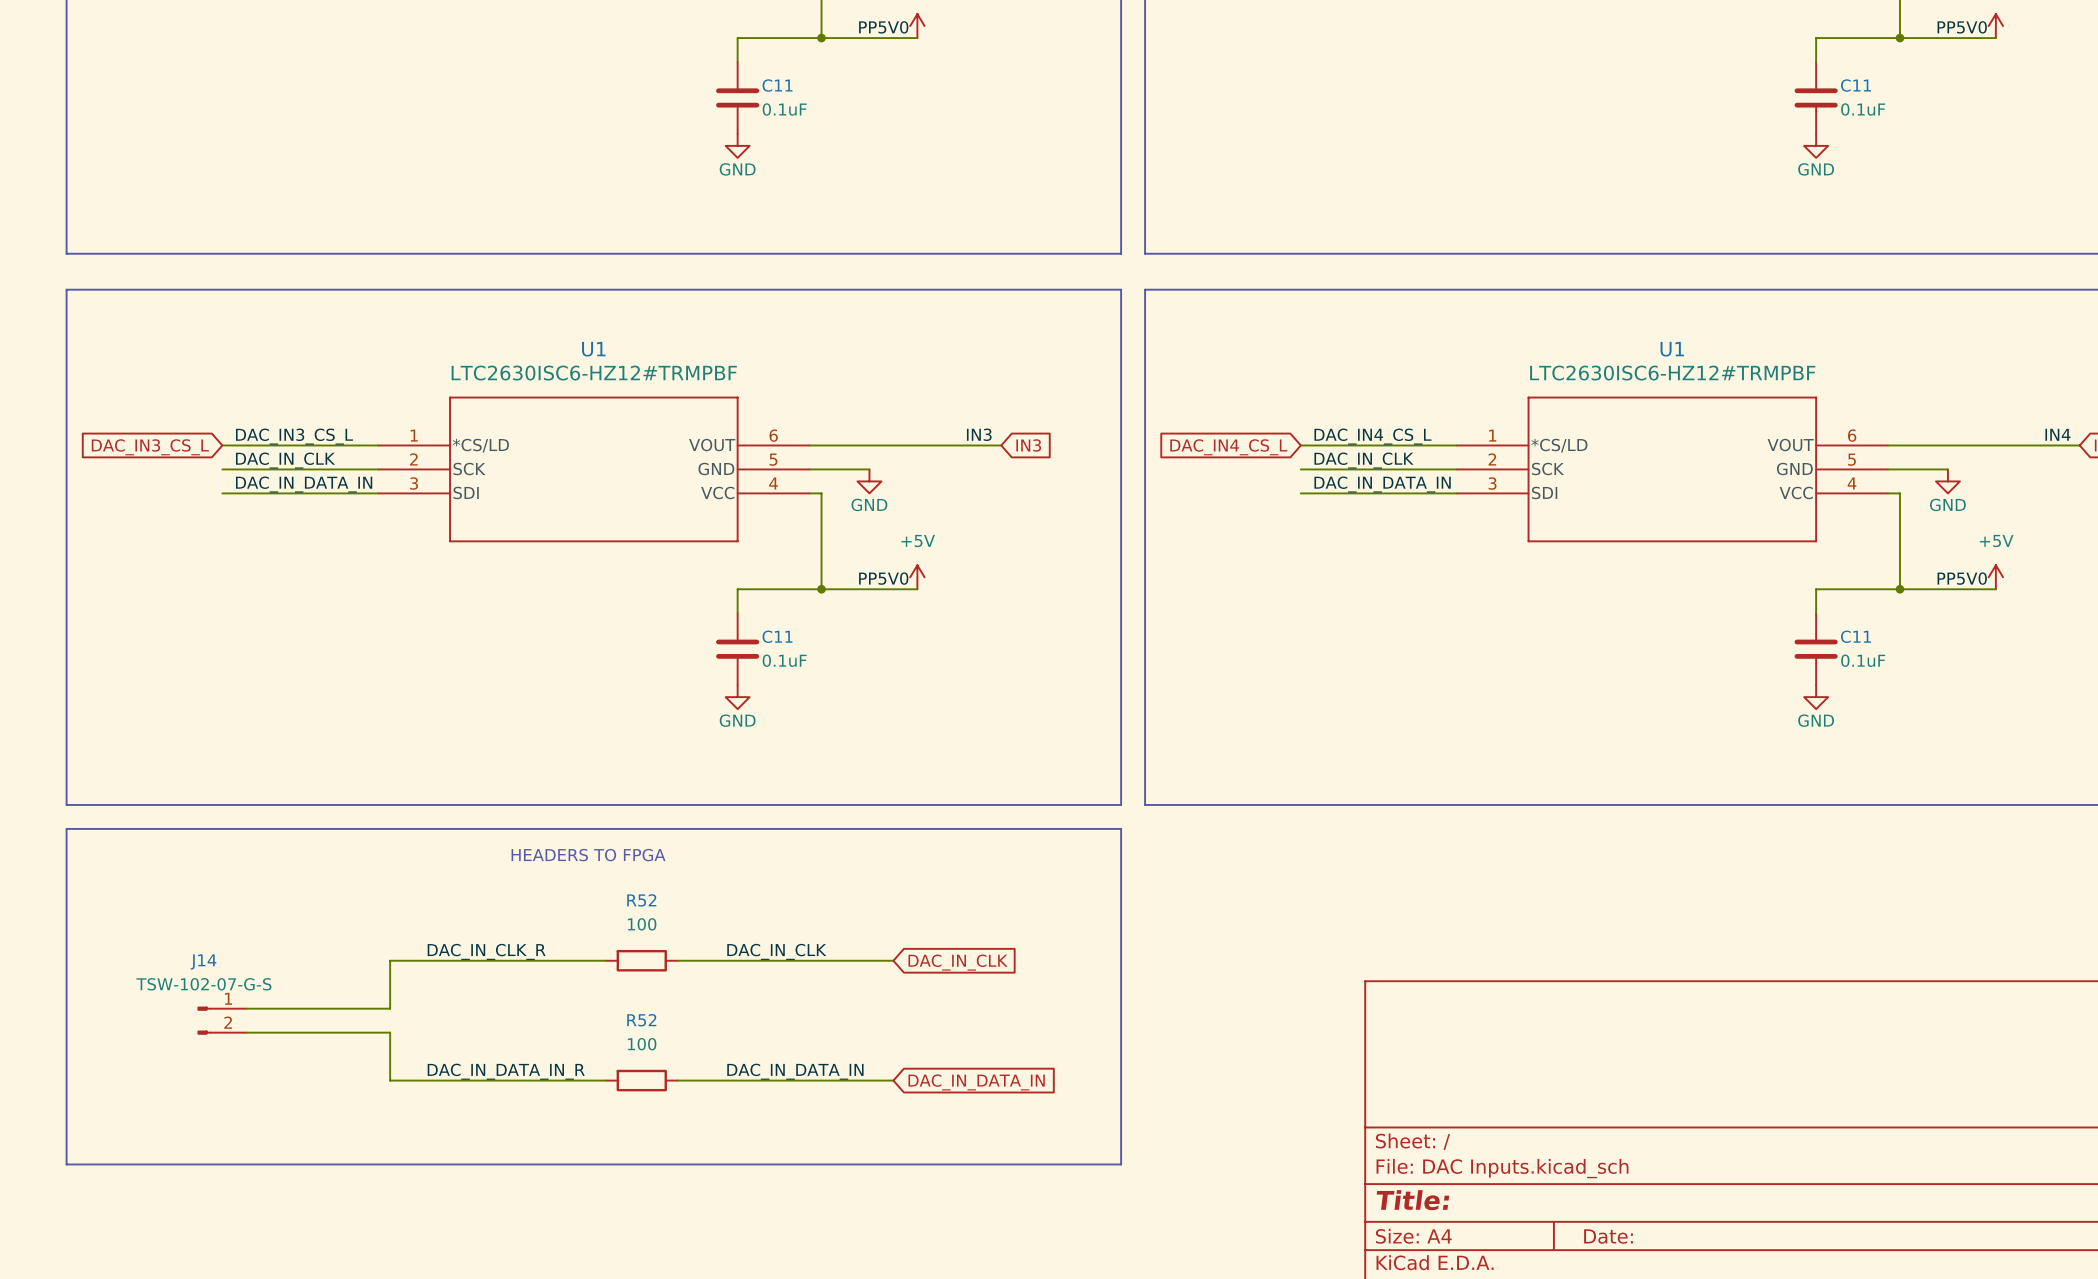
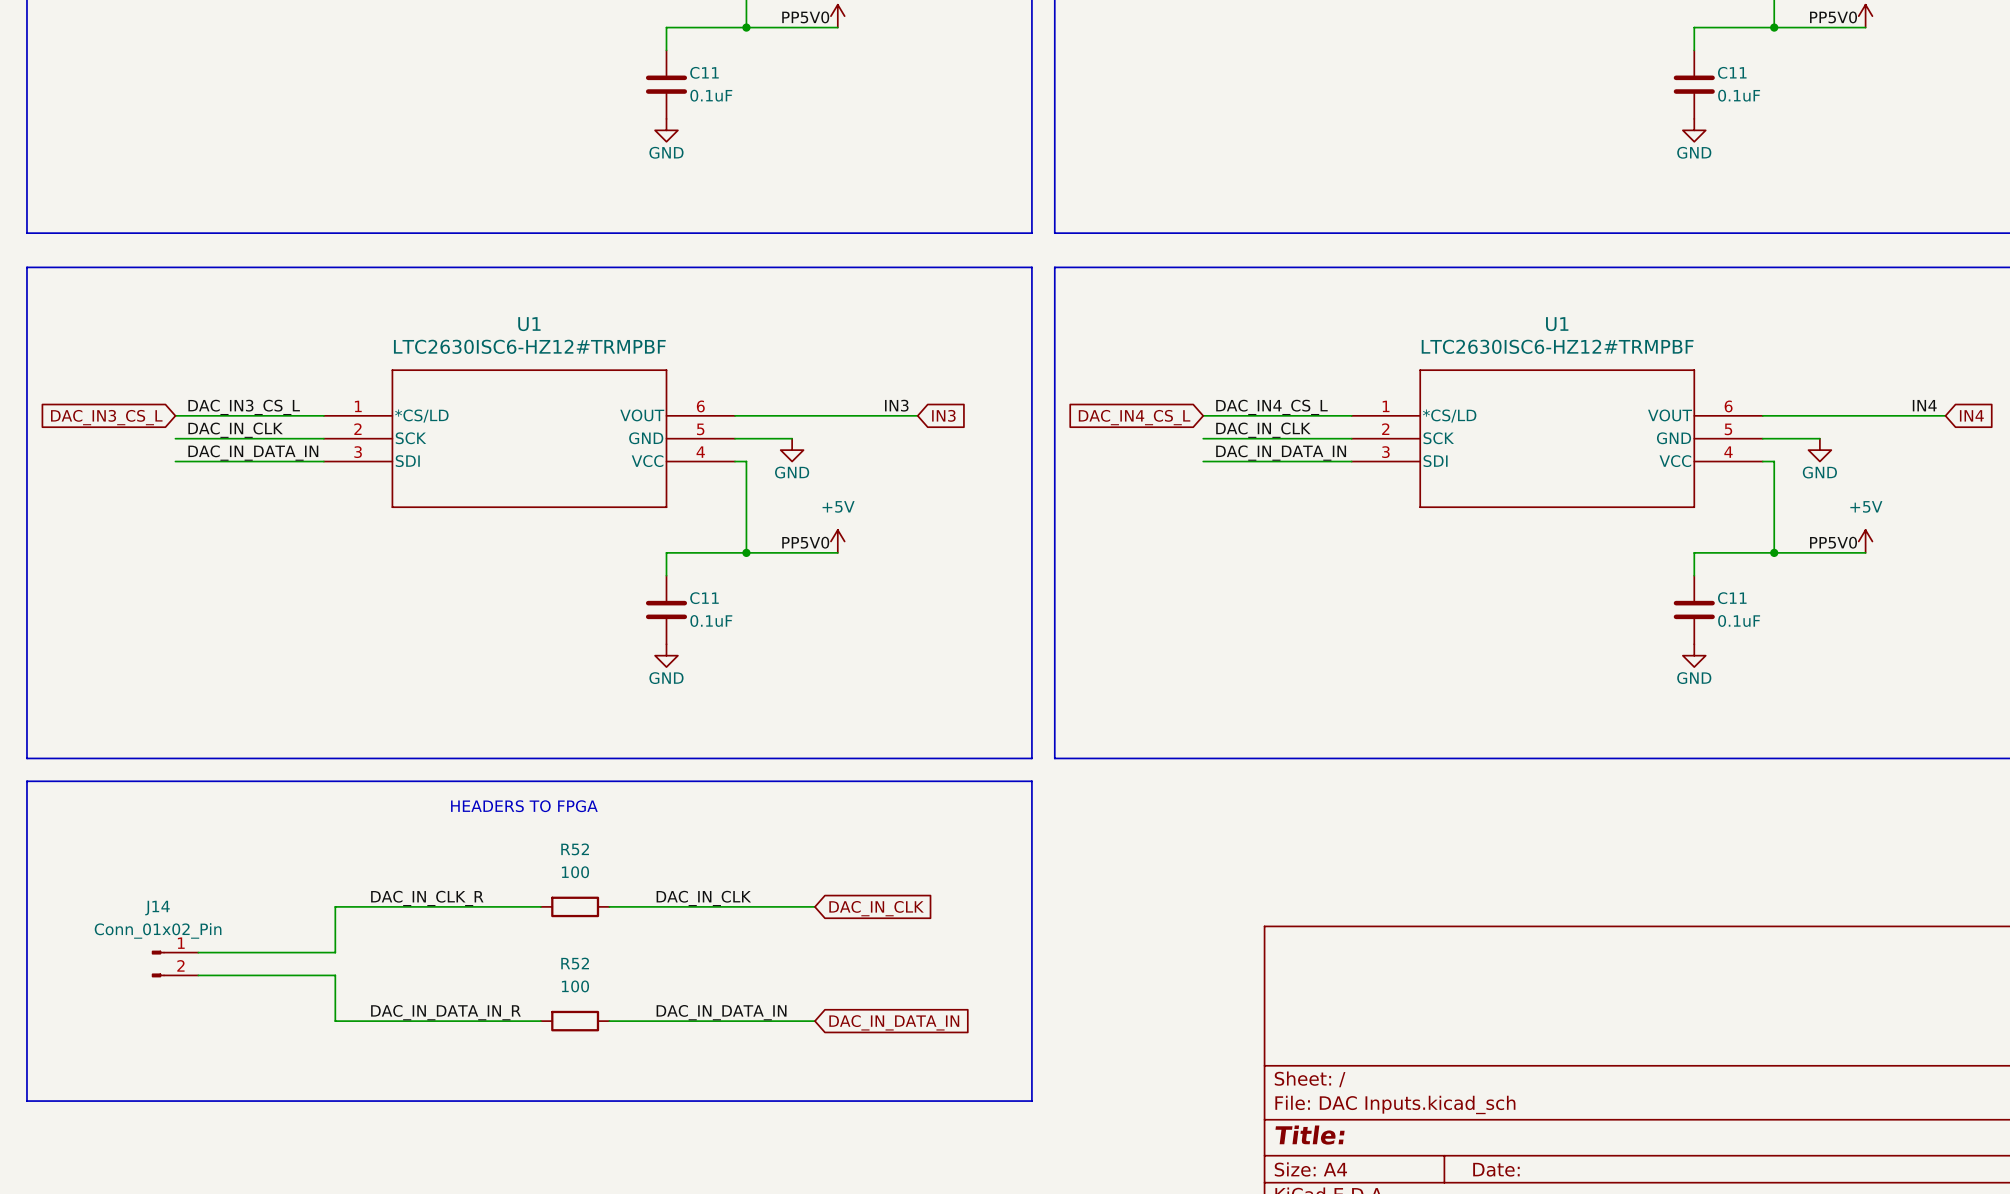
J14 value: TSW-102-07-G-S (203, 984) -> Conn_01x02_Pin (158, 930)

